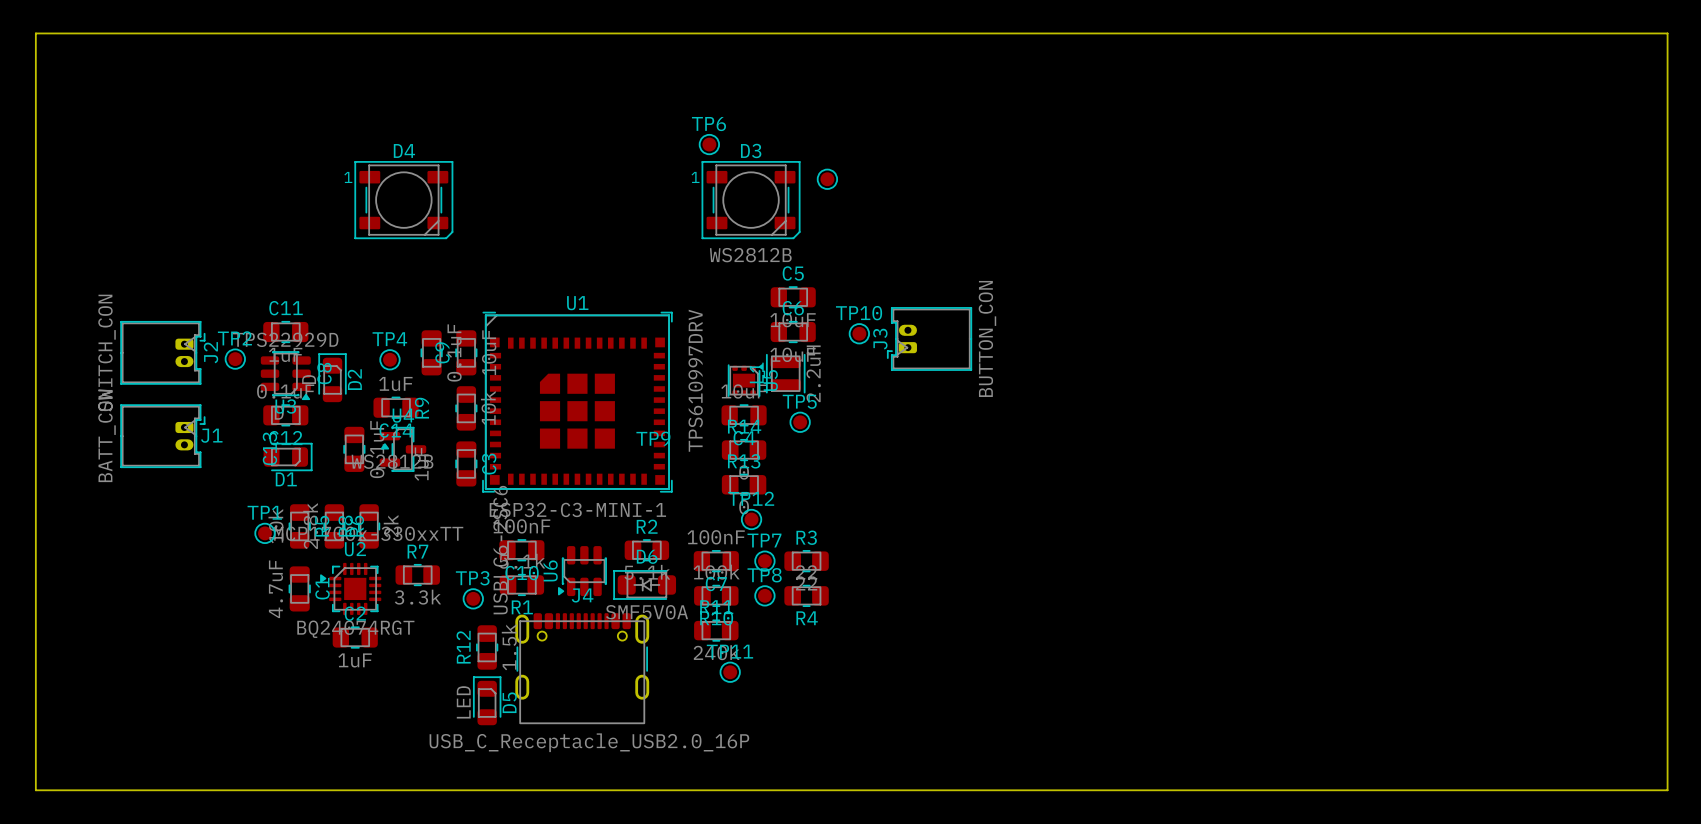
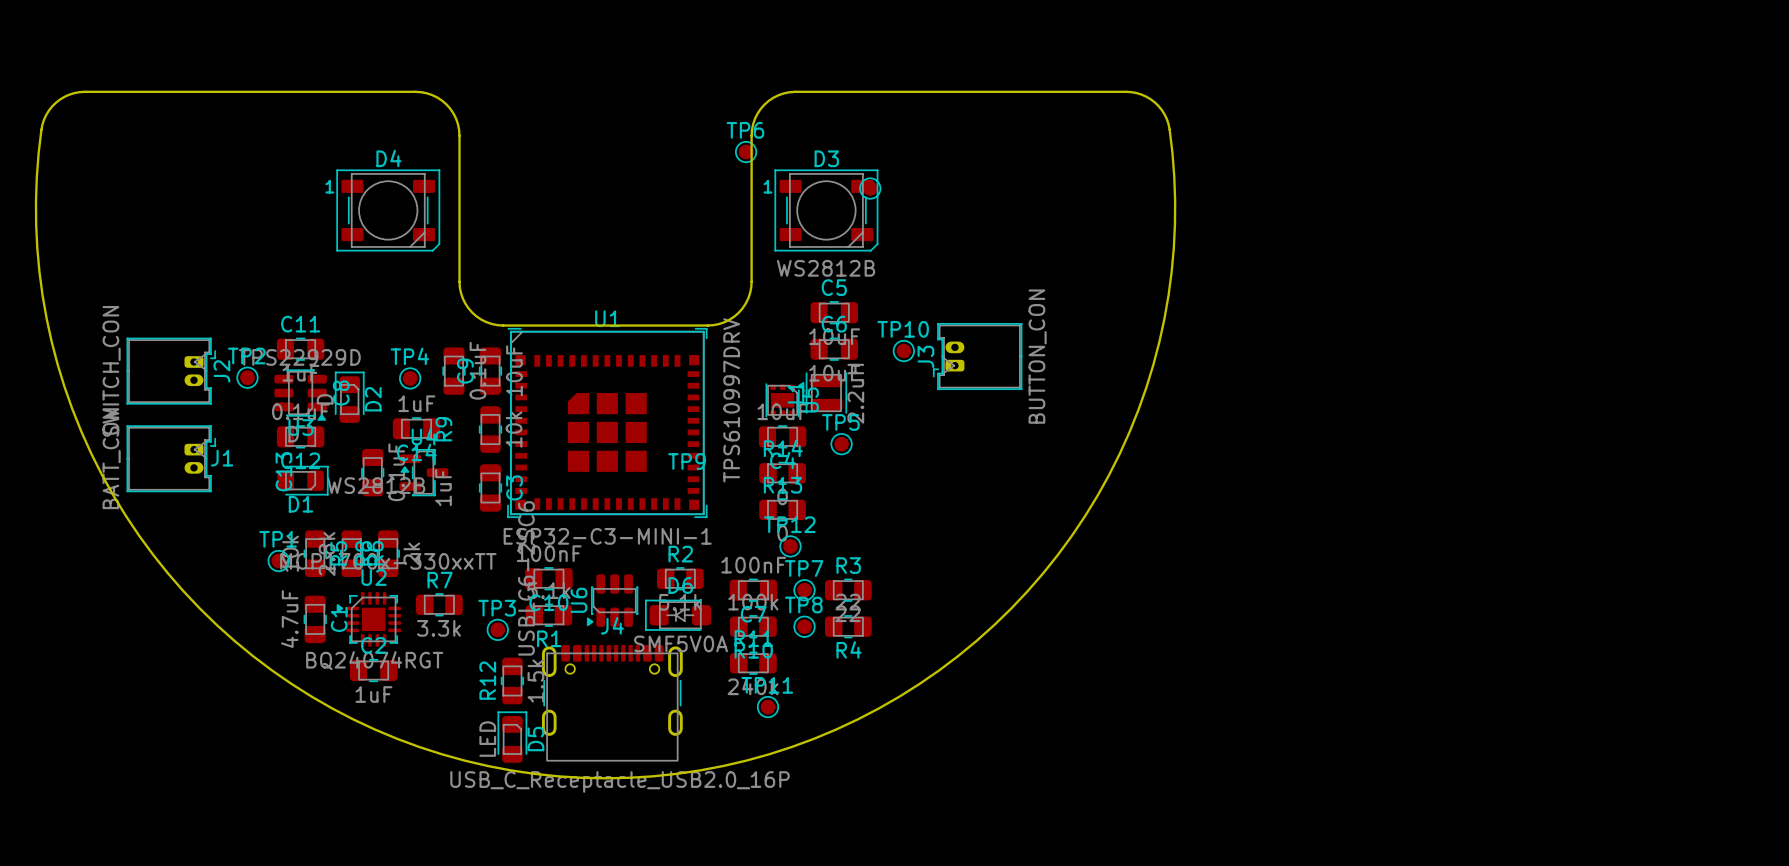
board edge: (35, 33) (1667, 33) (1667, 790) (35, 790) (35, 33) -> (84, 91) (69, 94) (56, 102) (49, 110) (42, 124) (36, 176) (37, 248) (46, 318) (64, 387) (81, 432) (113, 495) (139, 535) (183, 591) (234, 641) (271, 670) (332, 708) (374, 729) (441, 754) (487, 765) (534, 773) (581, 777) (629, 777) (700, 770) (746, 760) (814, 738) (878, 708) (919, 683) (958, 656) (994, 625) (1027, 591) (1071, 535) (1109, 474) (1129, 432) (1146, 387) (1159, 341) (1168, 295) (1173, 248) (1175, 200) (1172, 153) (1169, 129) (1164, 114) (1150, 99) (1136, 93) (795, 91) (778, 95) (760, 108) (753, 124) (751, 287) (745, 303) (734, 316) (719, 324) (707, 325) (503, 325) (486, 322) (476, 316) (465, 303) (460, 293) (459, 129) (453, 113) (437, 97) (415, 91) (84, 91)
D4 position: (403, 200) -> (388, 210)
D3 position: (751, 200) -> (826, 210)

